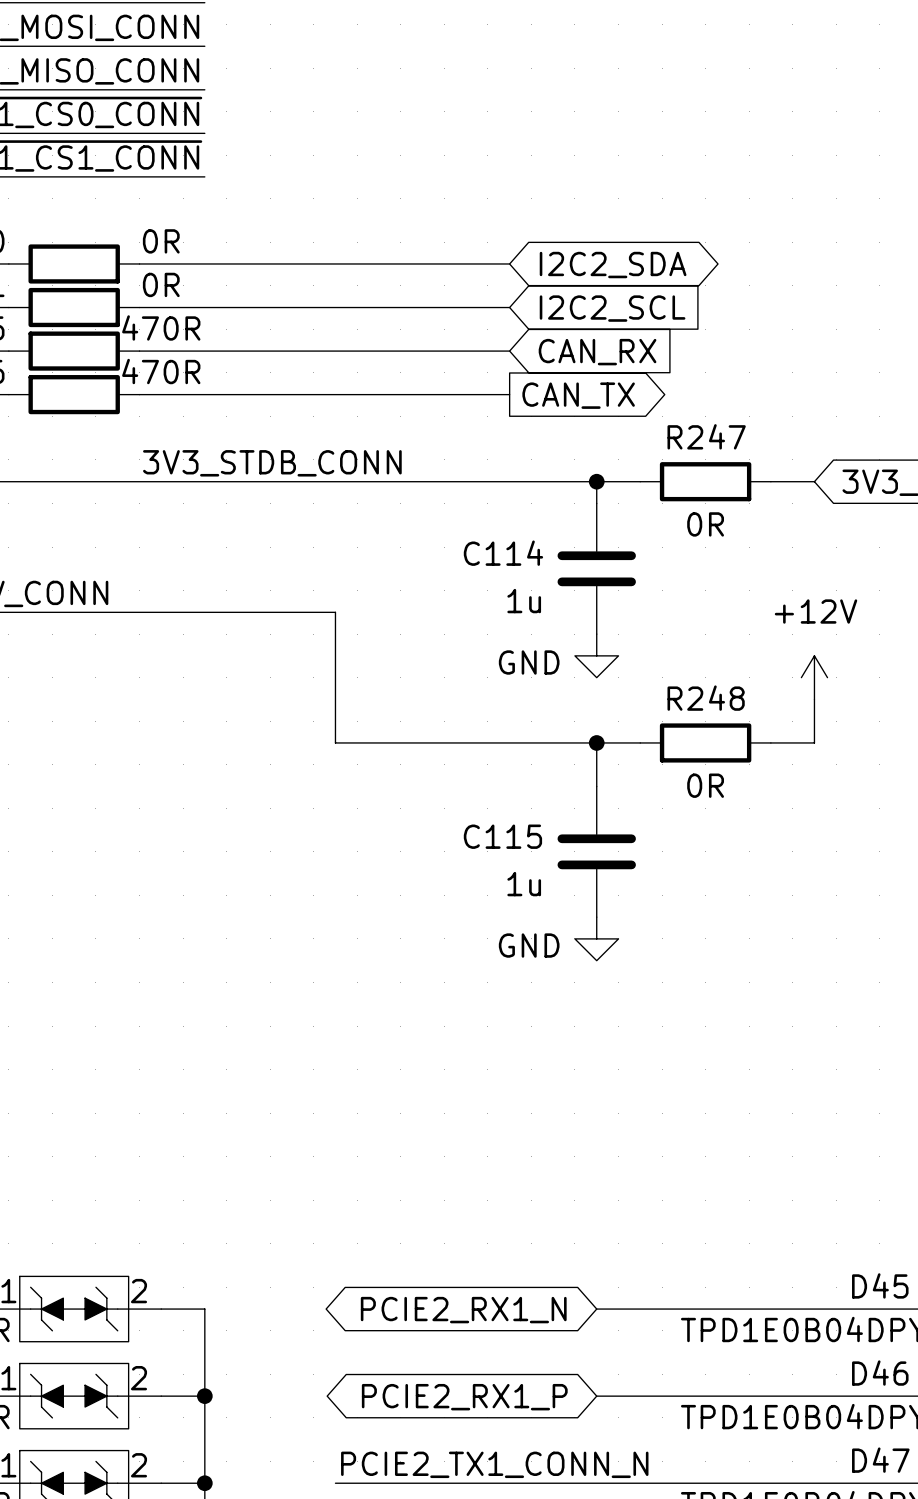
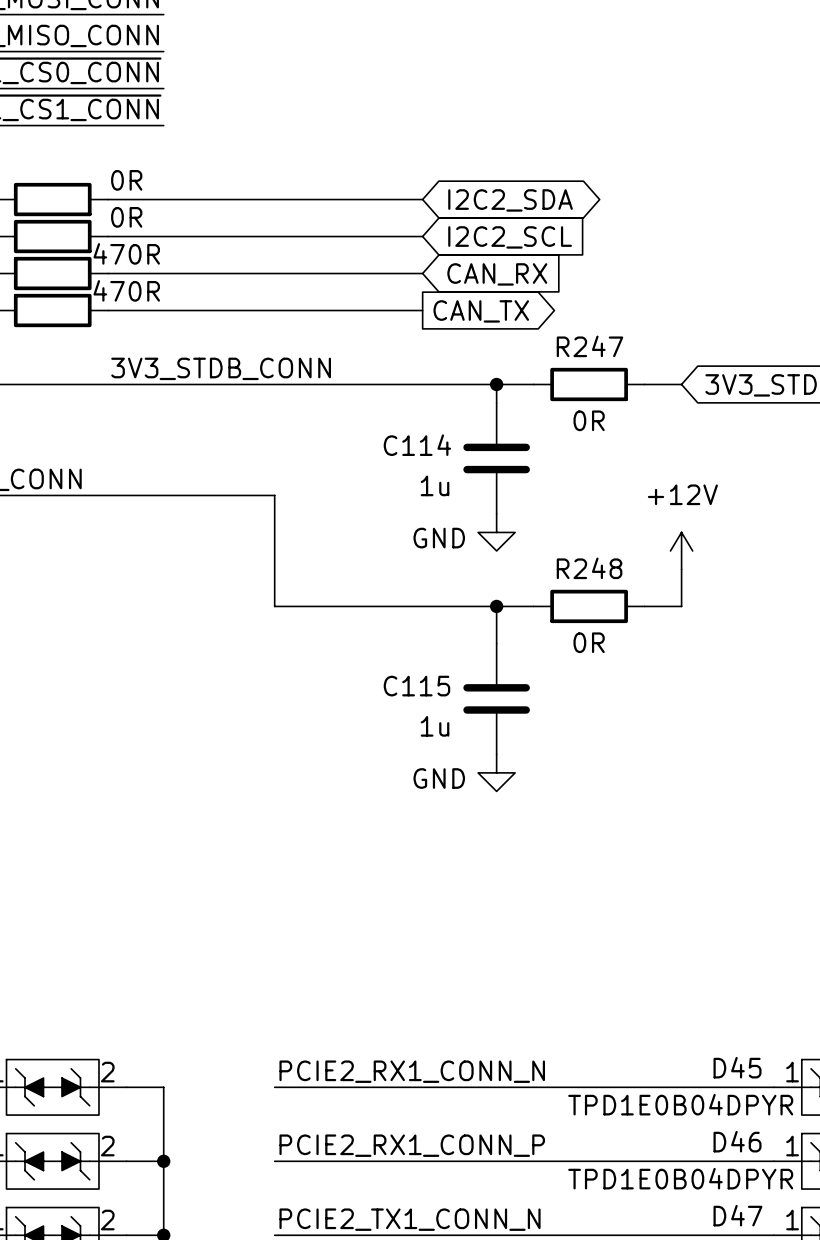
label: none -> PCIE2_RX1_CONN_N (412, 1071)
wire: none -> (274, 1087) (496, 1087)
global label: PCIE2_RX1_N (463, 1310) -> none
label: none -> PCIE2_RX1_CONN_P (412, 1145)
wire: none -> (274, 1161) (496, 1161)
global label: PCIE2_RX1_P (464, 1397) -> none

